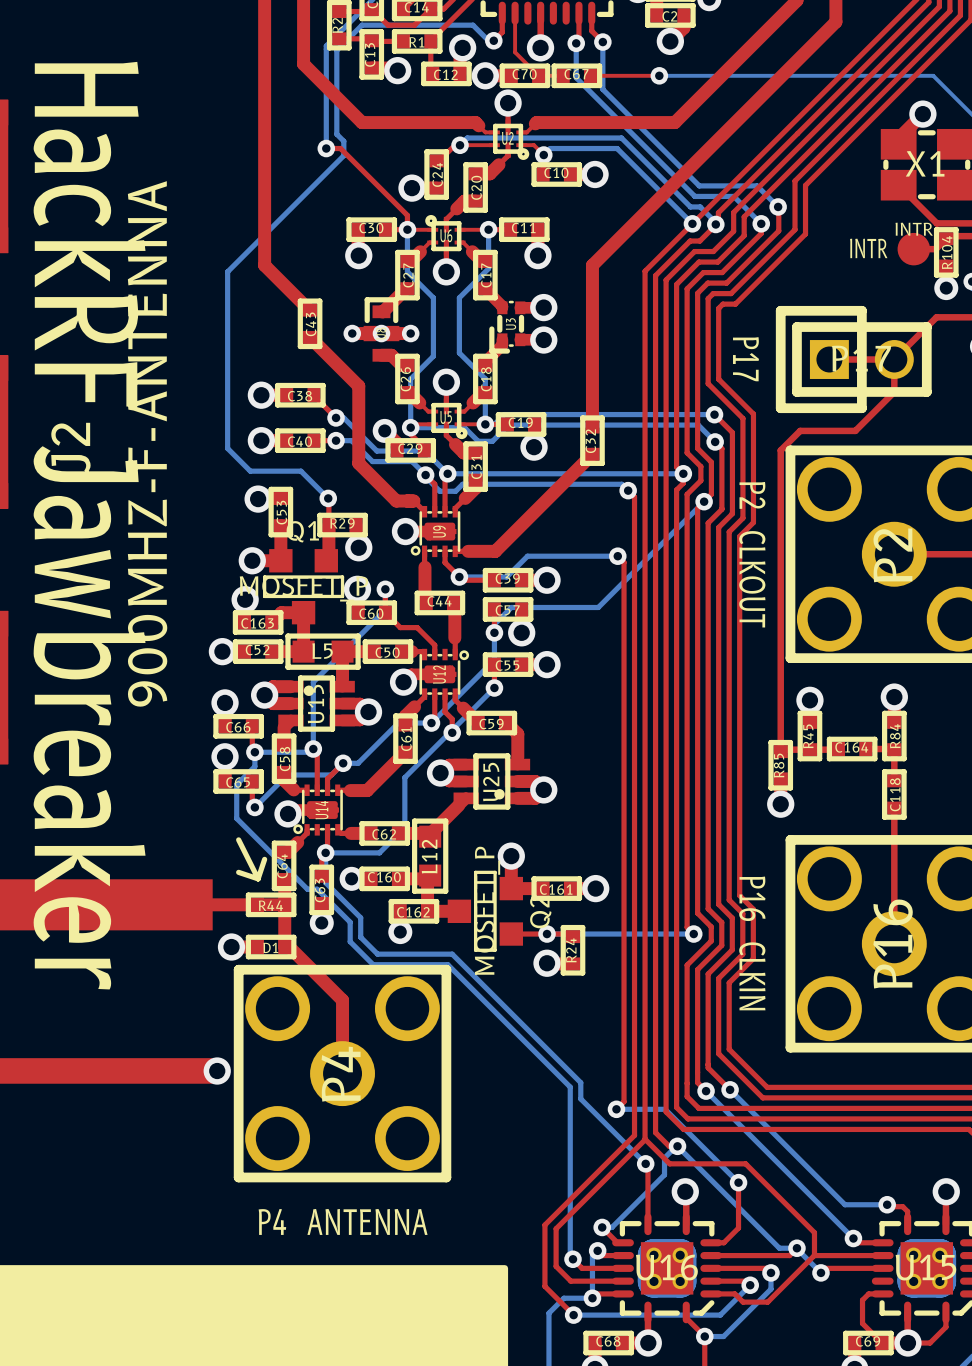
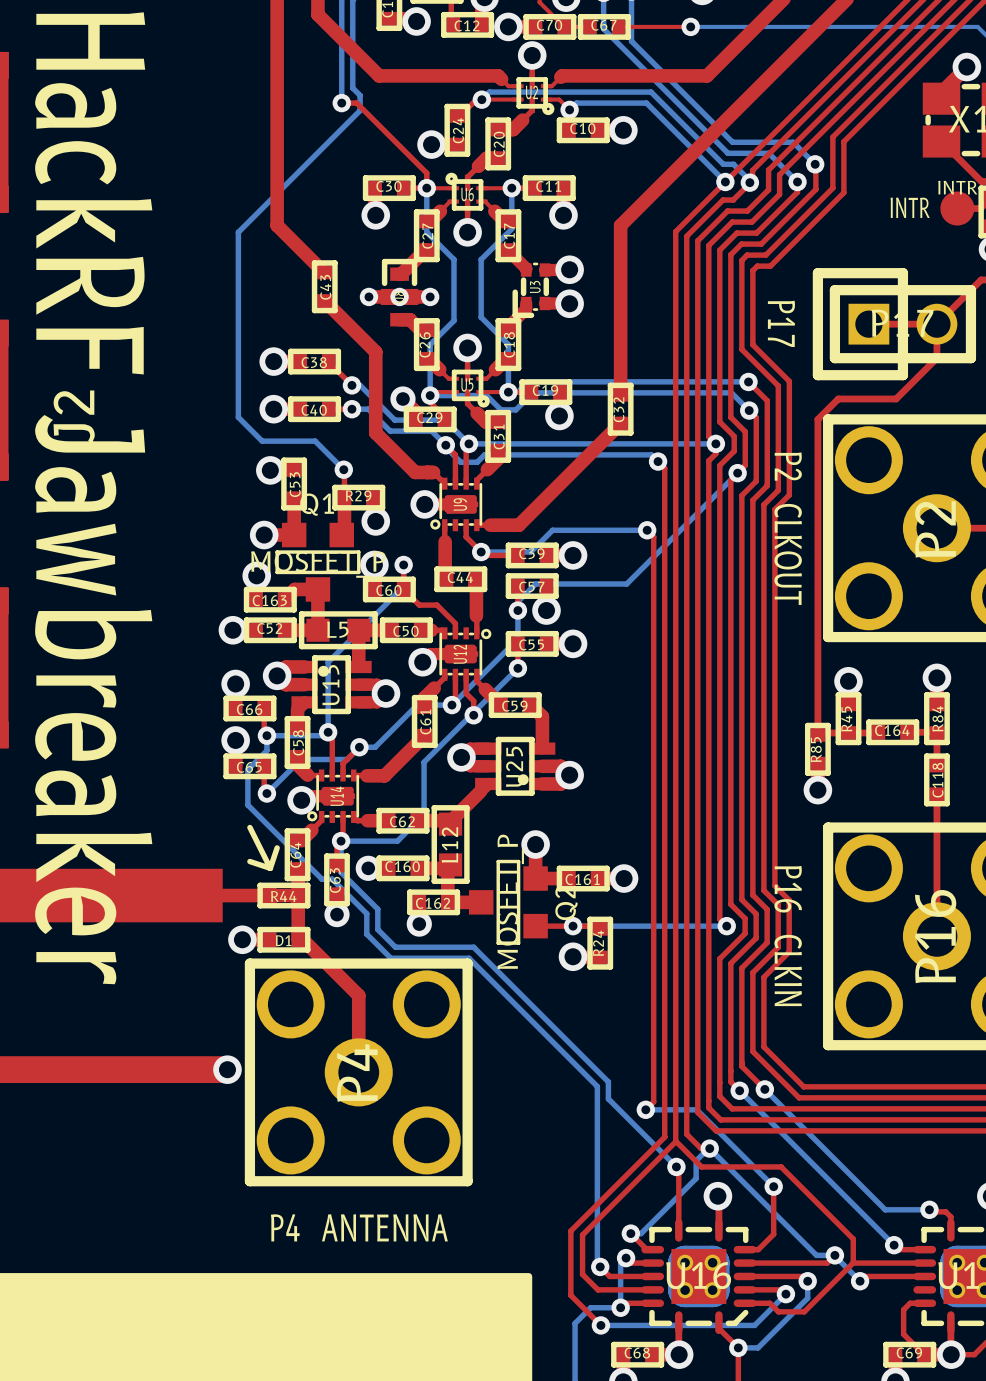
J2 value: 900MHZ-F-ANTENNA (147, 443) -> none

